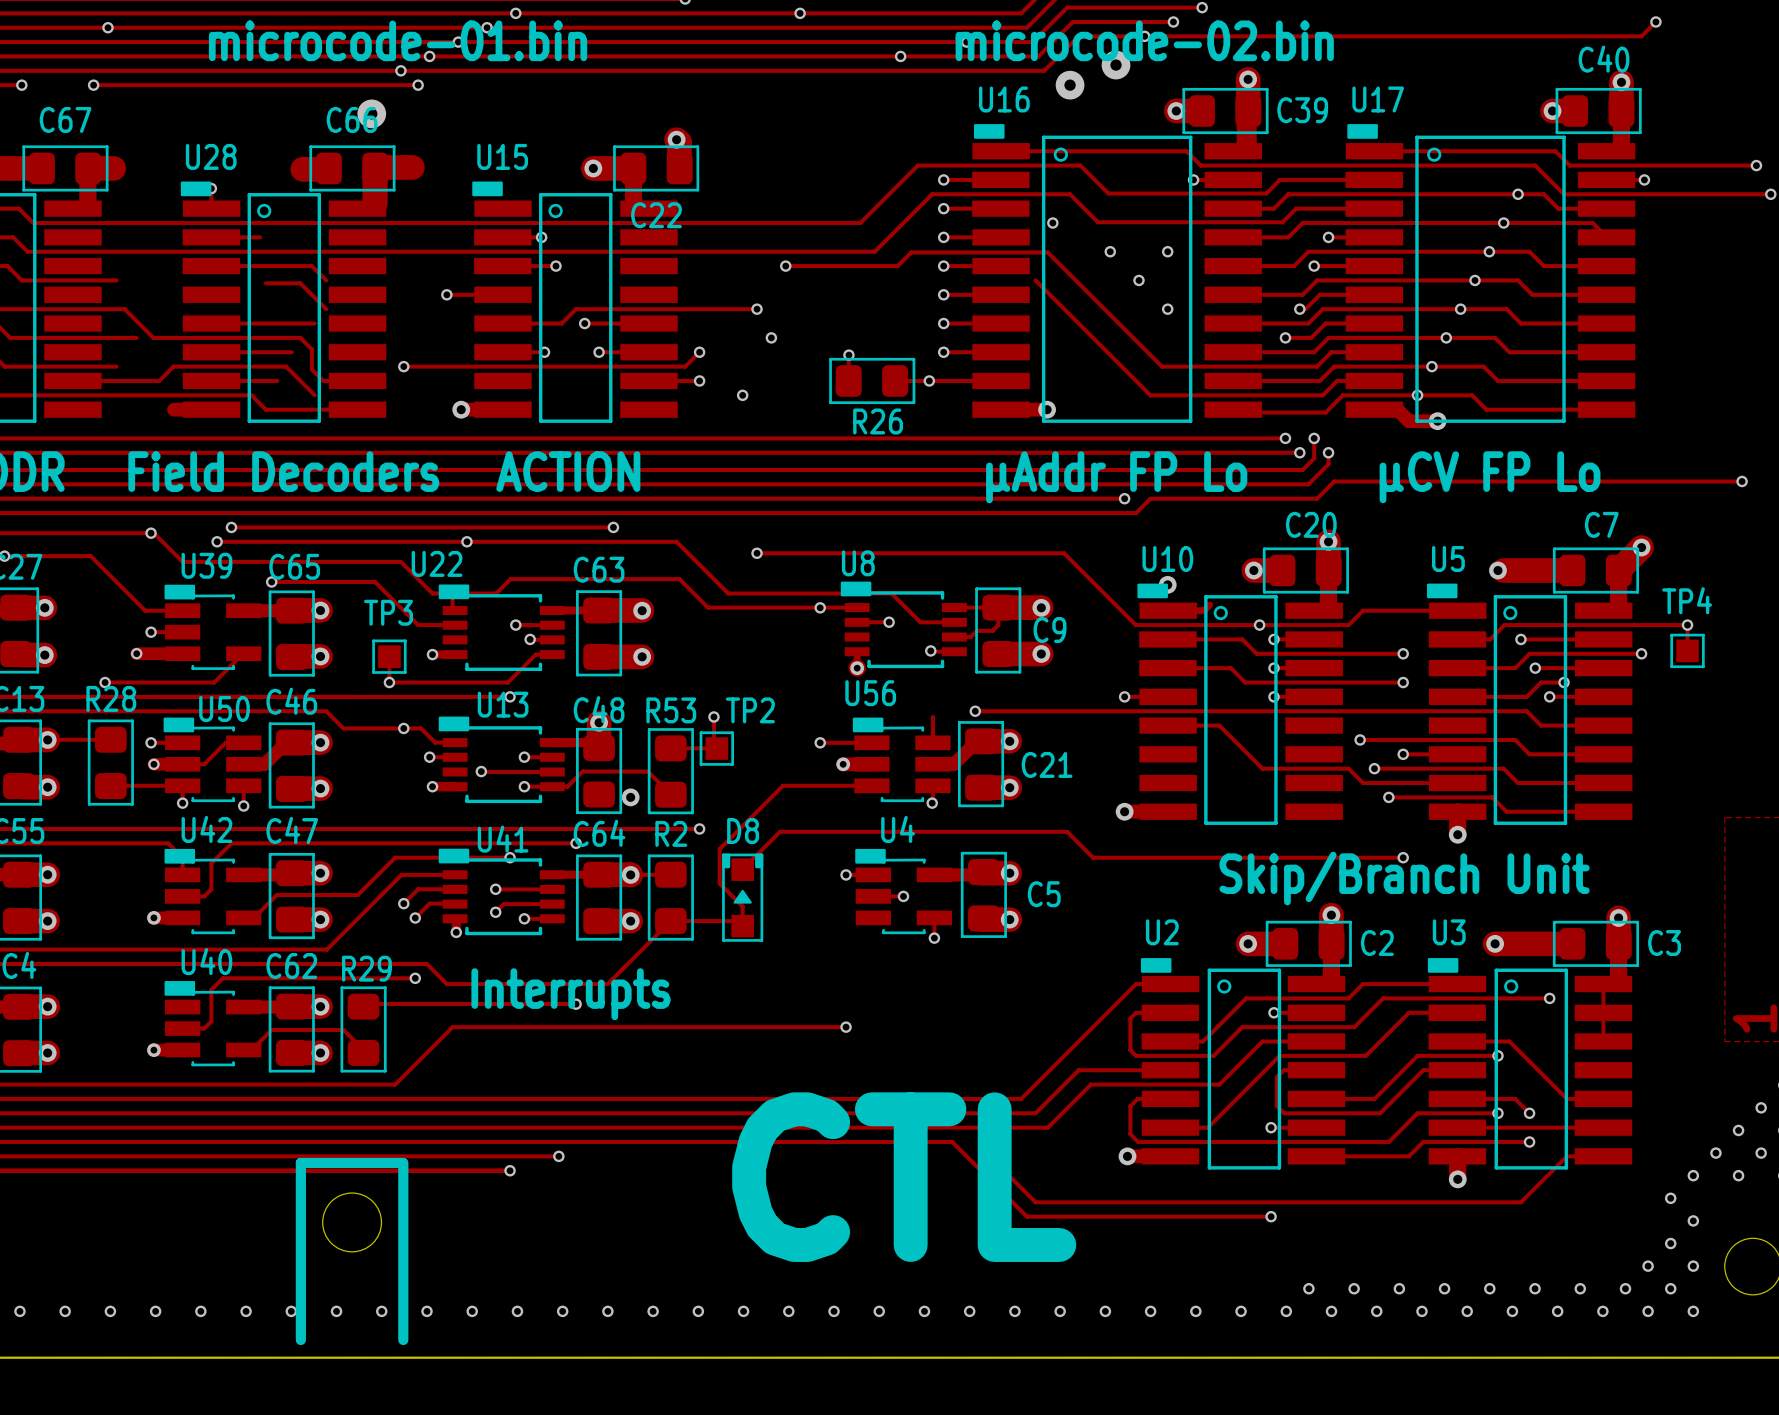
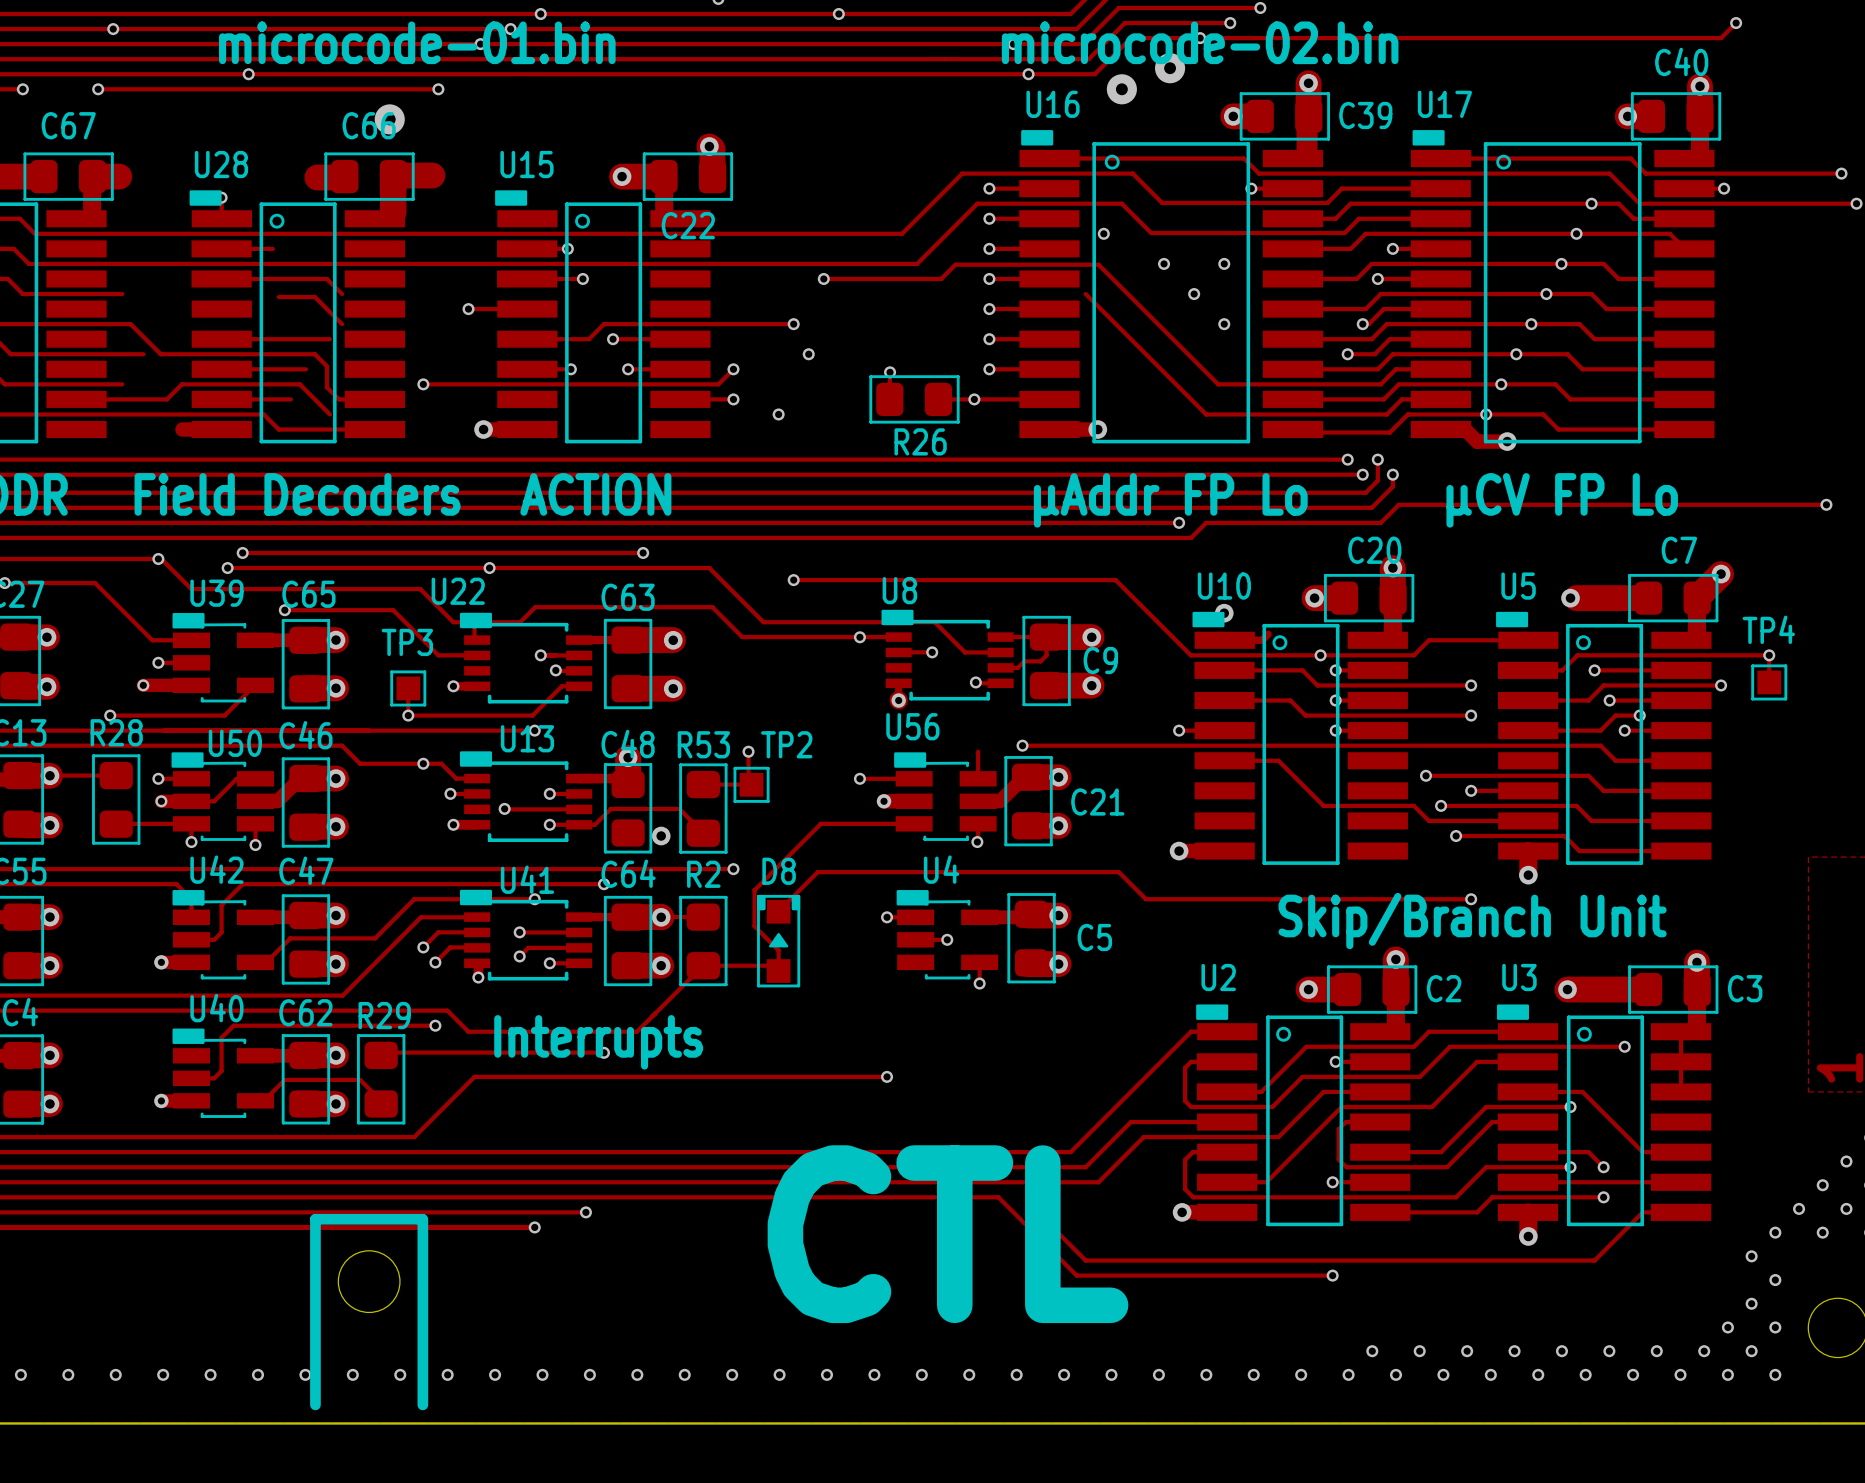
via: (429, 56) -> none
via position: (900, 56) -> (1028, 74)
via: none -> (248, 74)
via: (400, 70) -> none

